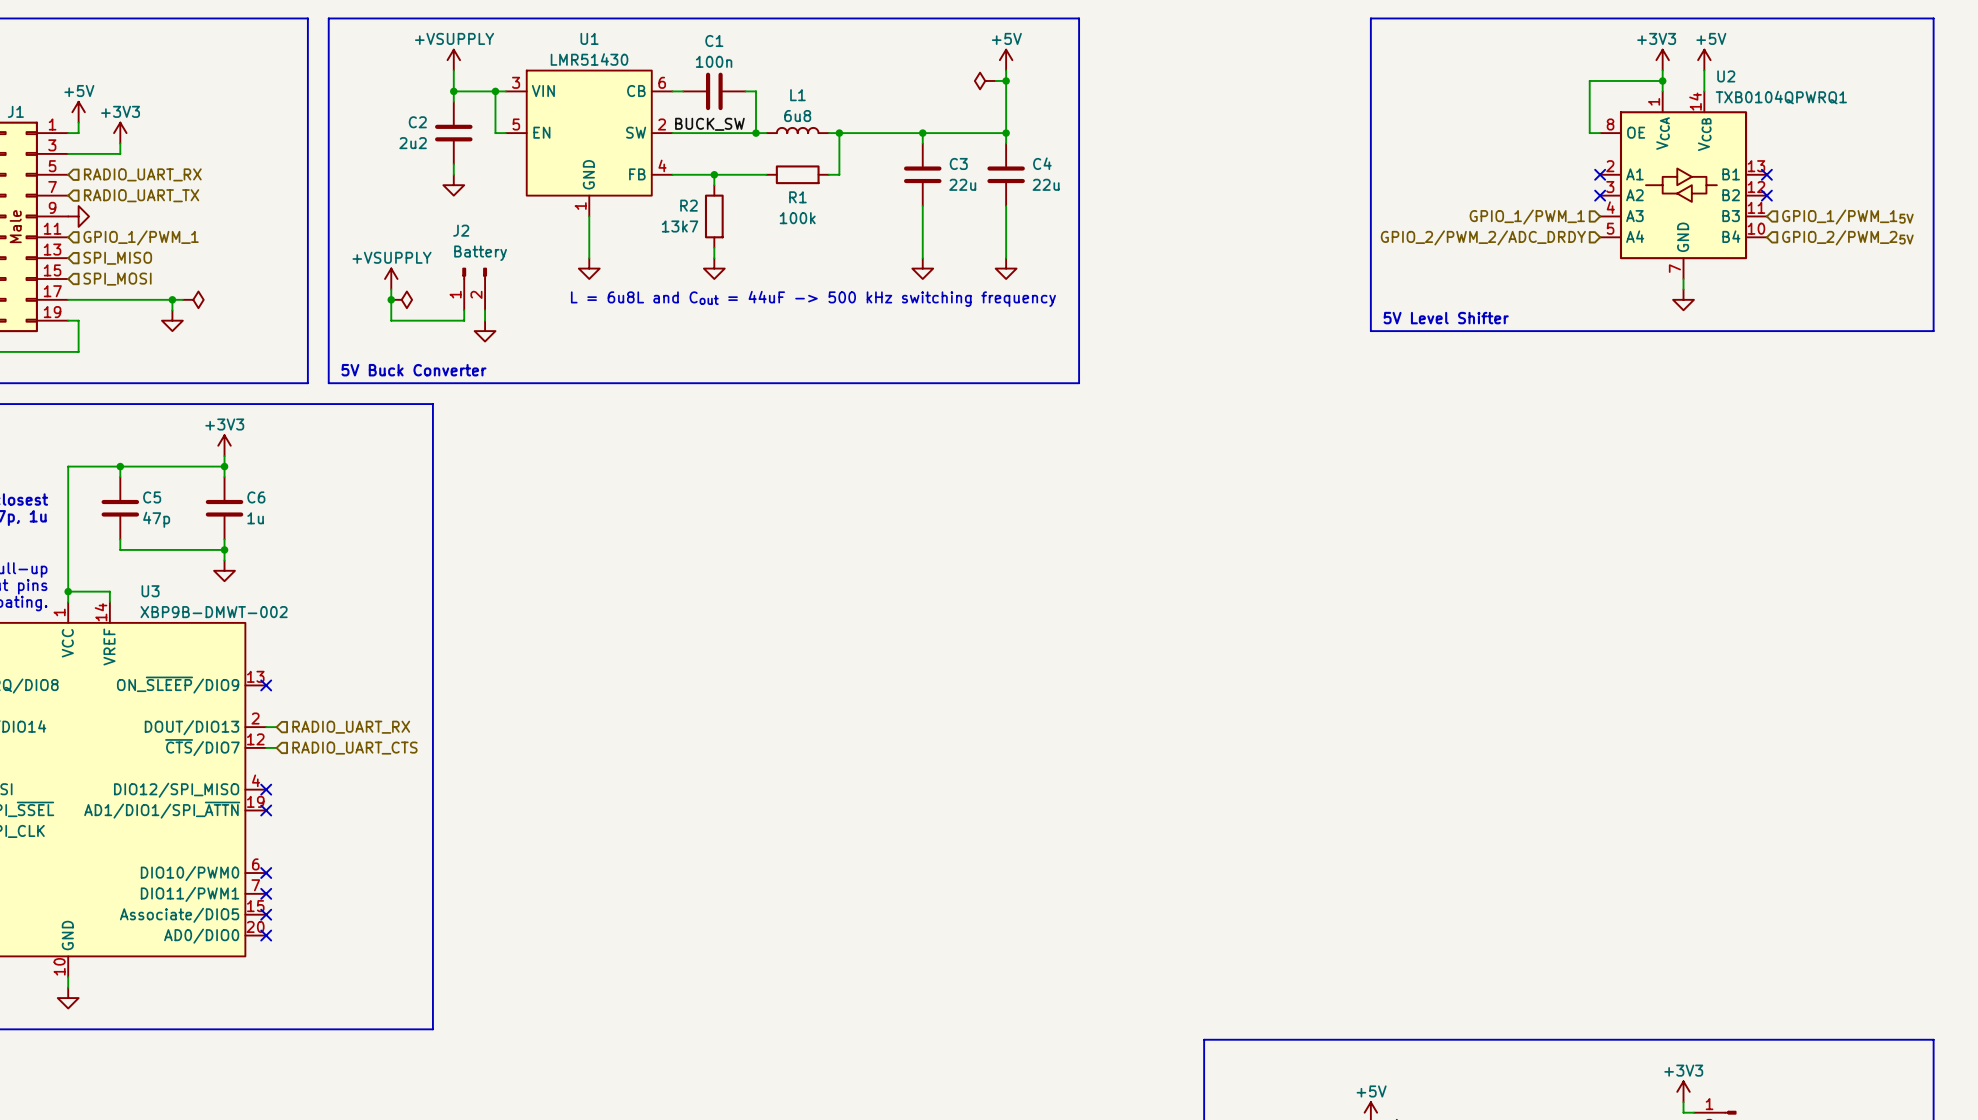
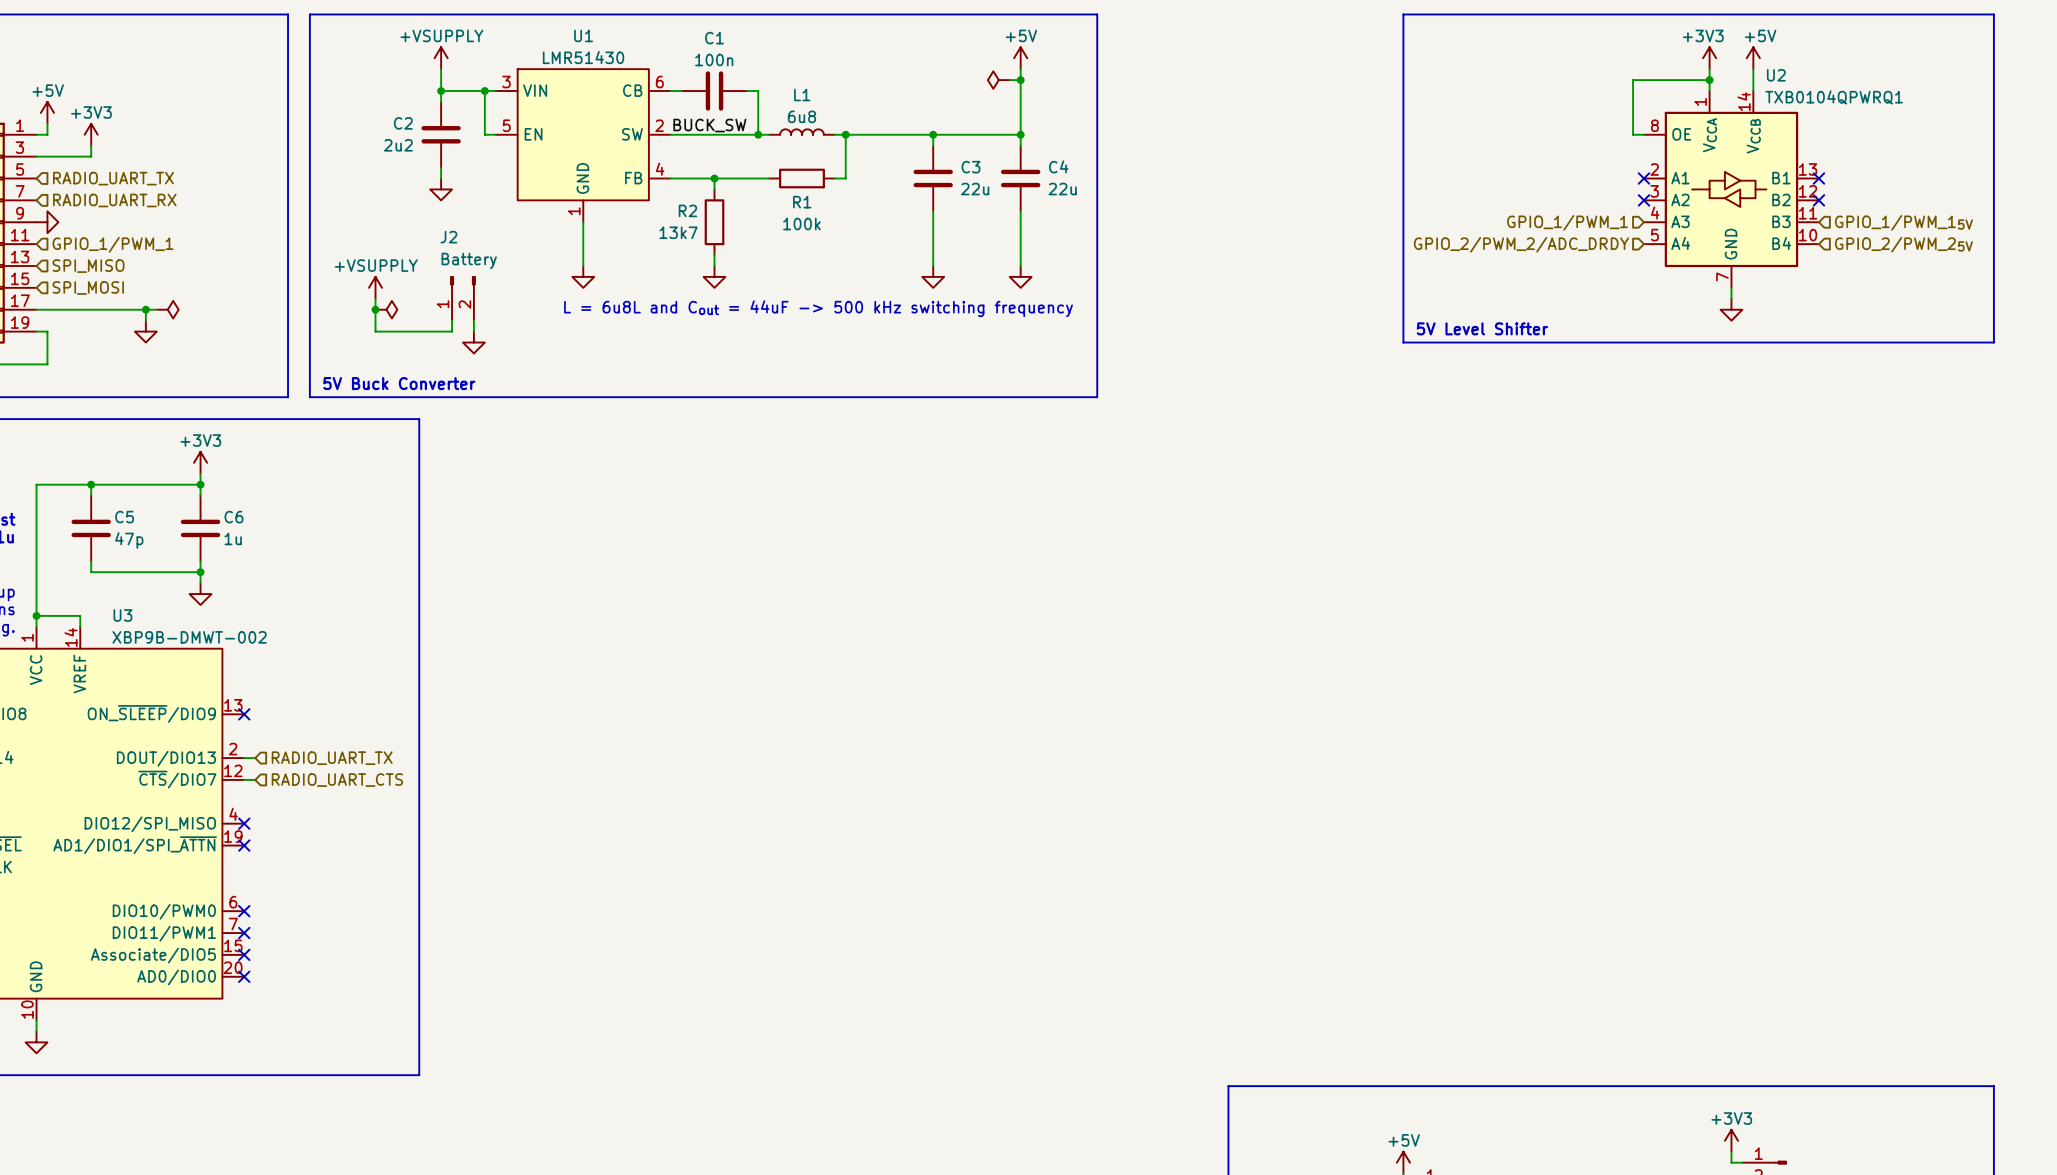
hierarchical label: RADIO_UART_RX (142, 174) -> RADIO_UART_TX (113, 178)
hierarchical label: RADIO_UART_TX (141, 195) -> RADIO_UART_RX (114, 200)
hierarchical label: RADIO_UART_RX (351, 727) -> RADIO_UART_TX (332, 758)

